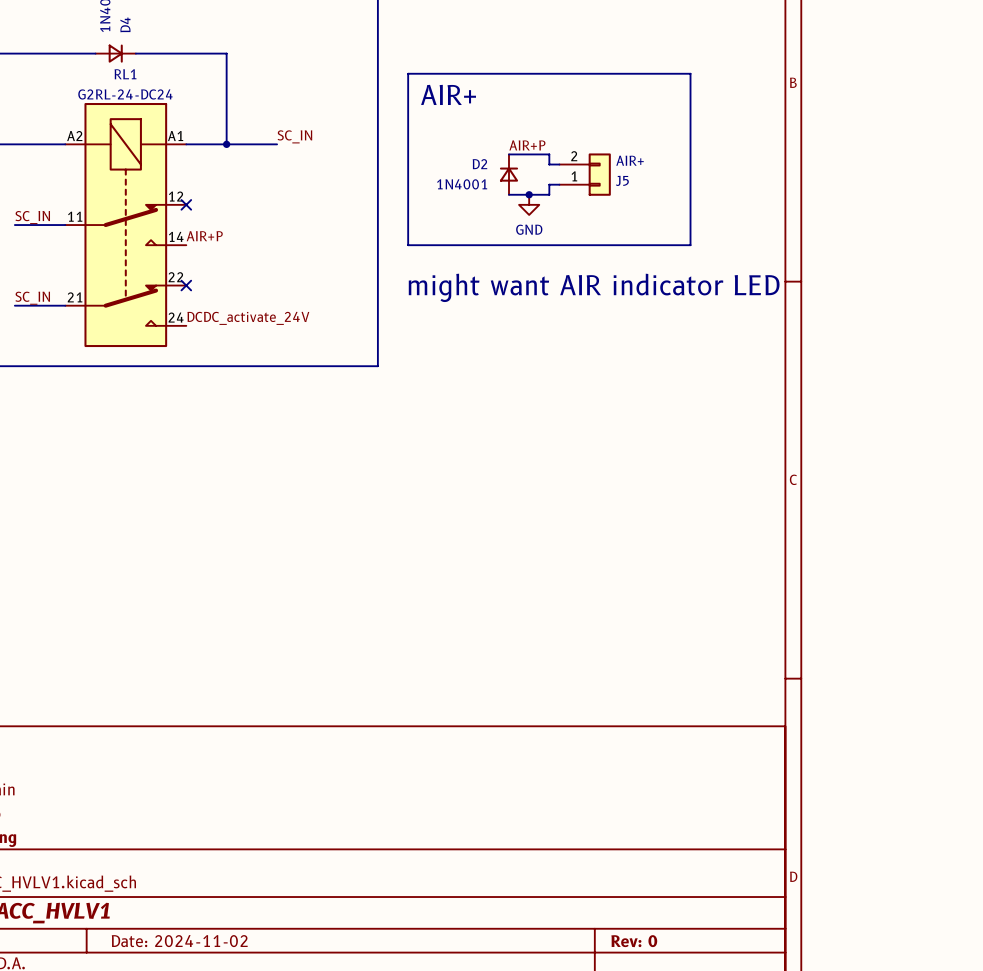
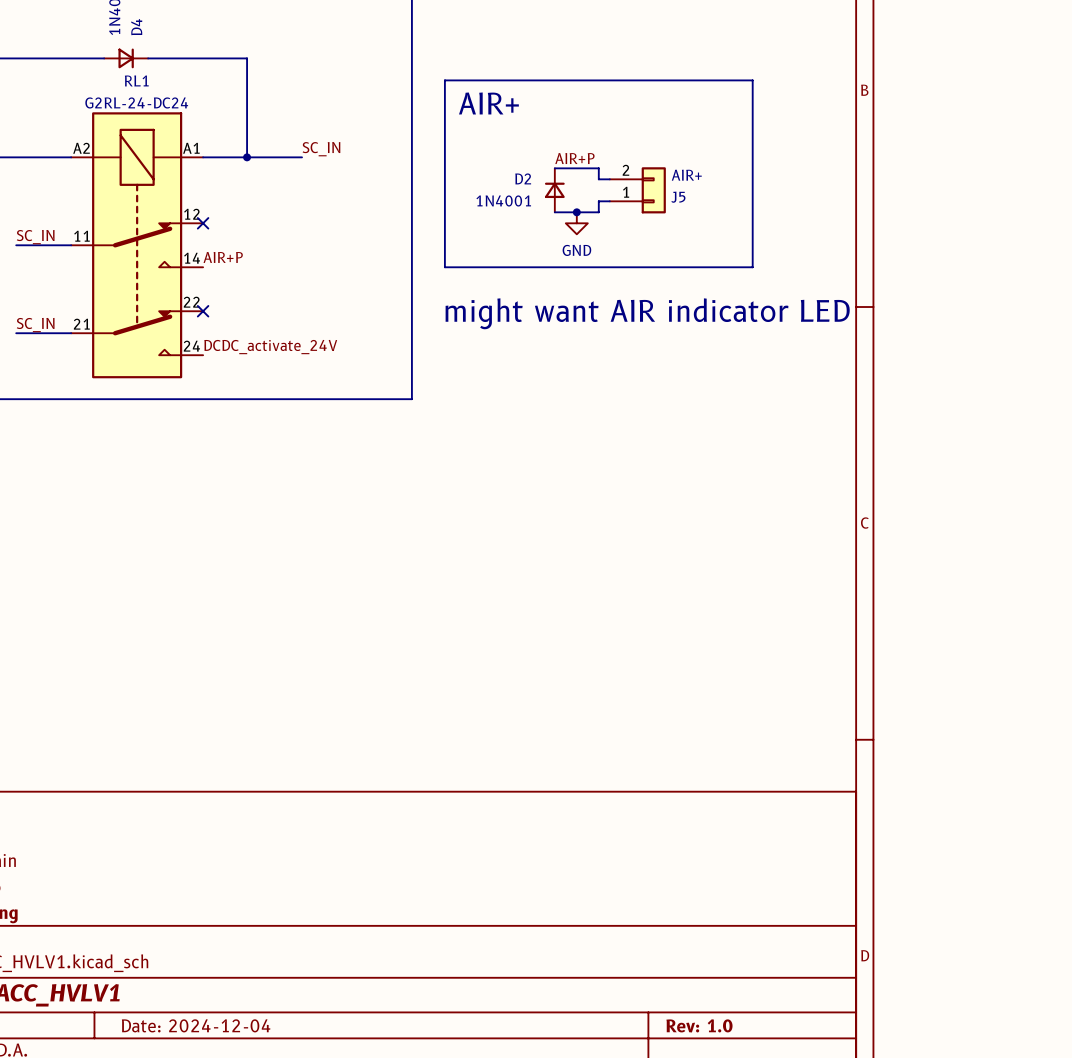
title block: Date: 2024-11-02 (179, 941) -> Date: 2024-12-04 (196, 1025)
title block: Rev: 0 (634, 941) -> Rev: 1.0 (699, 1025)

